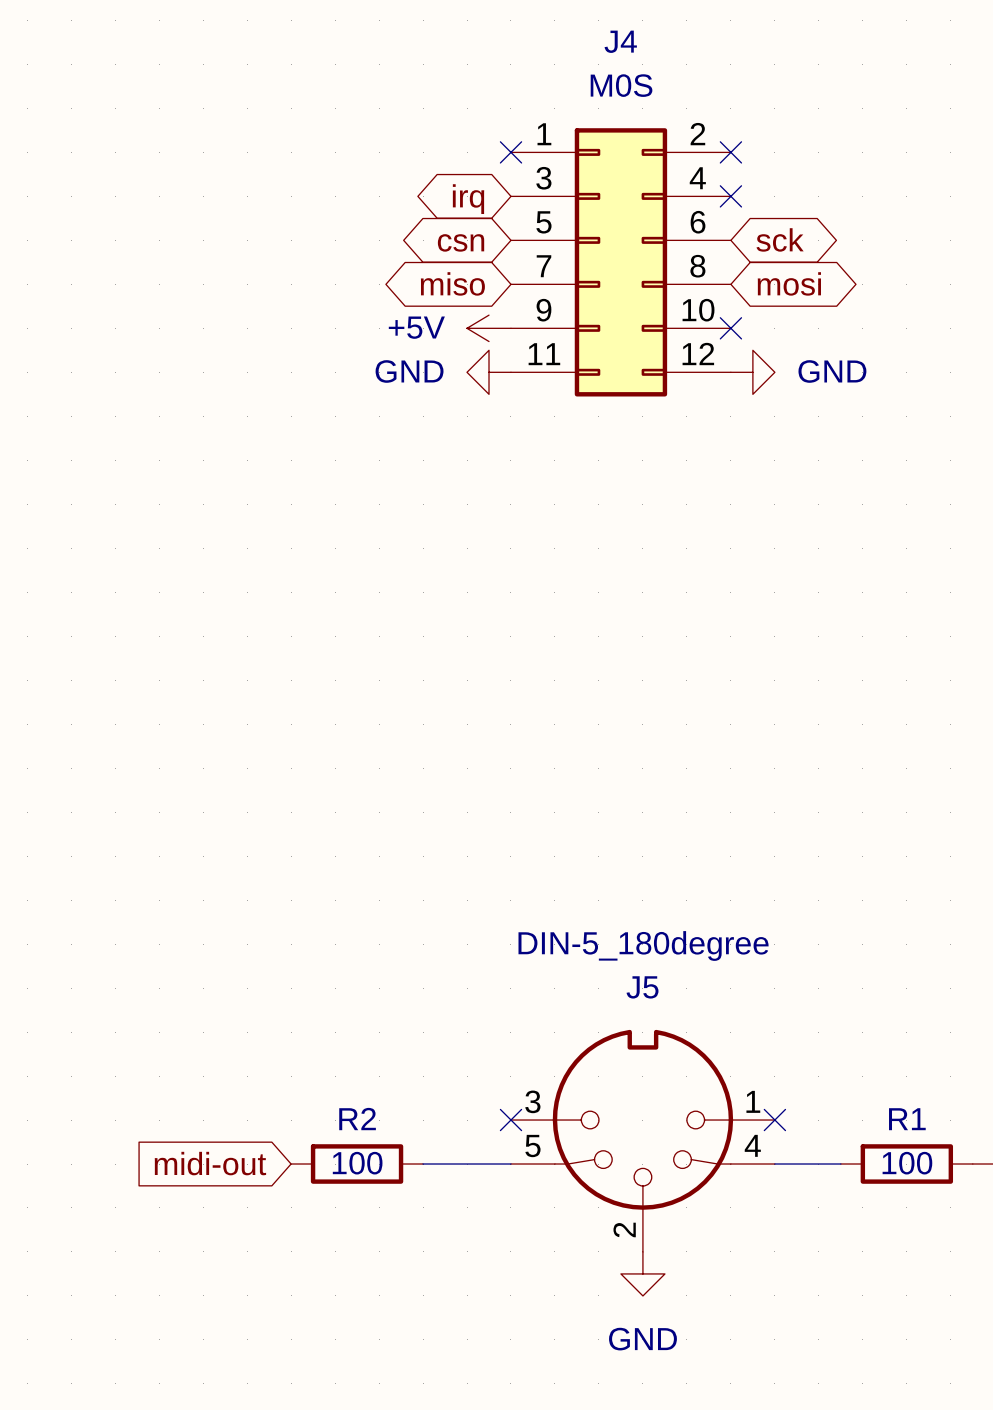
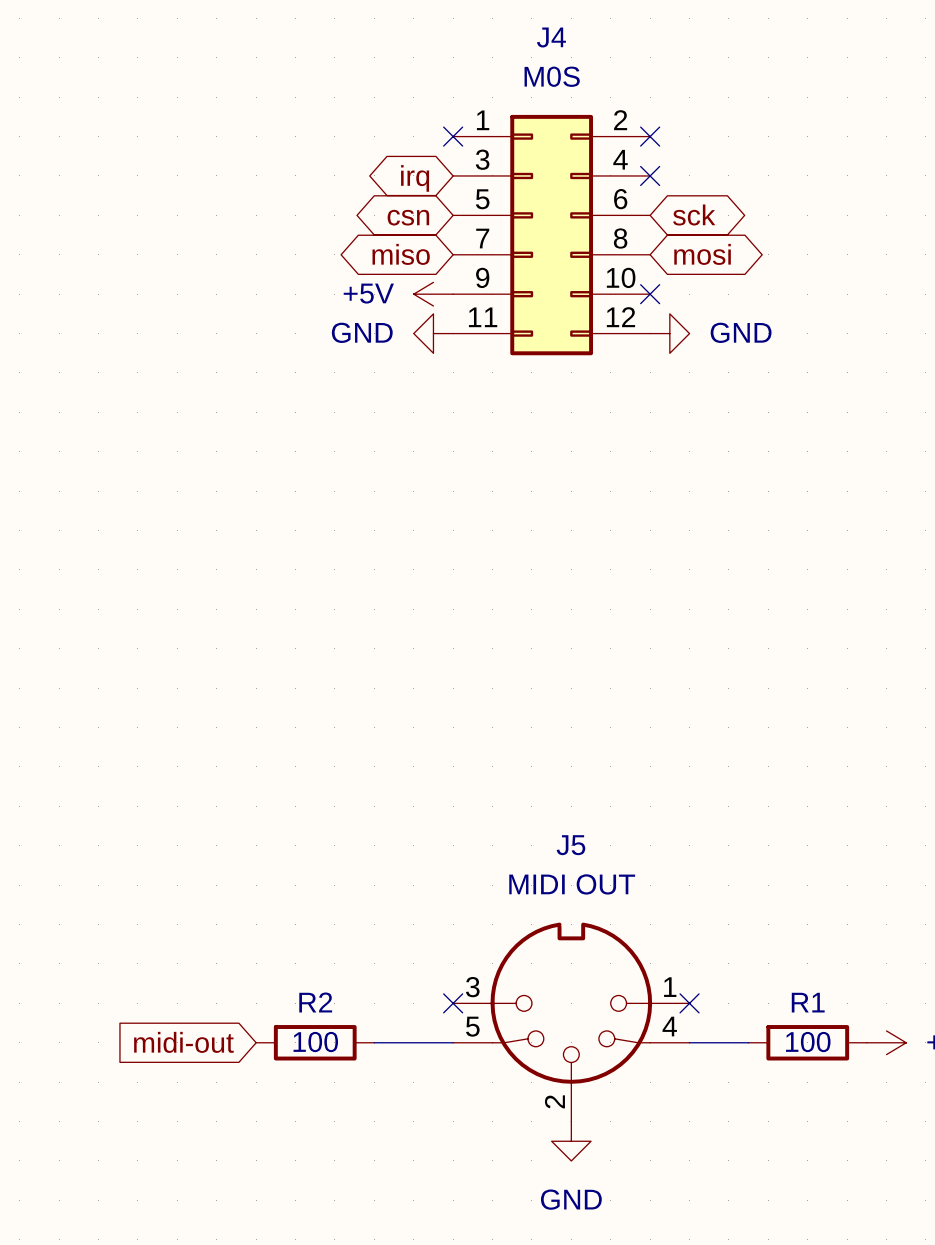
J5 value: DIN-5_180degree (643, 945) -> MIDI OUT (572, 884)
J5 name position: J5 (642, 987) -> J5 (570, 845)

